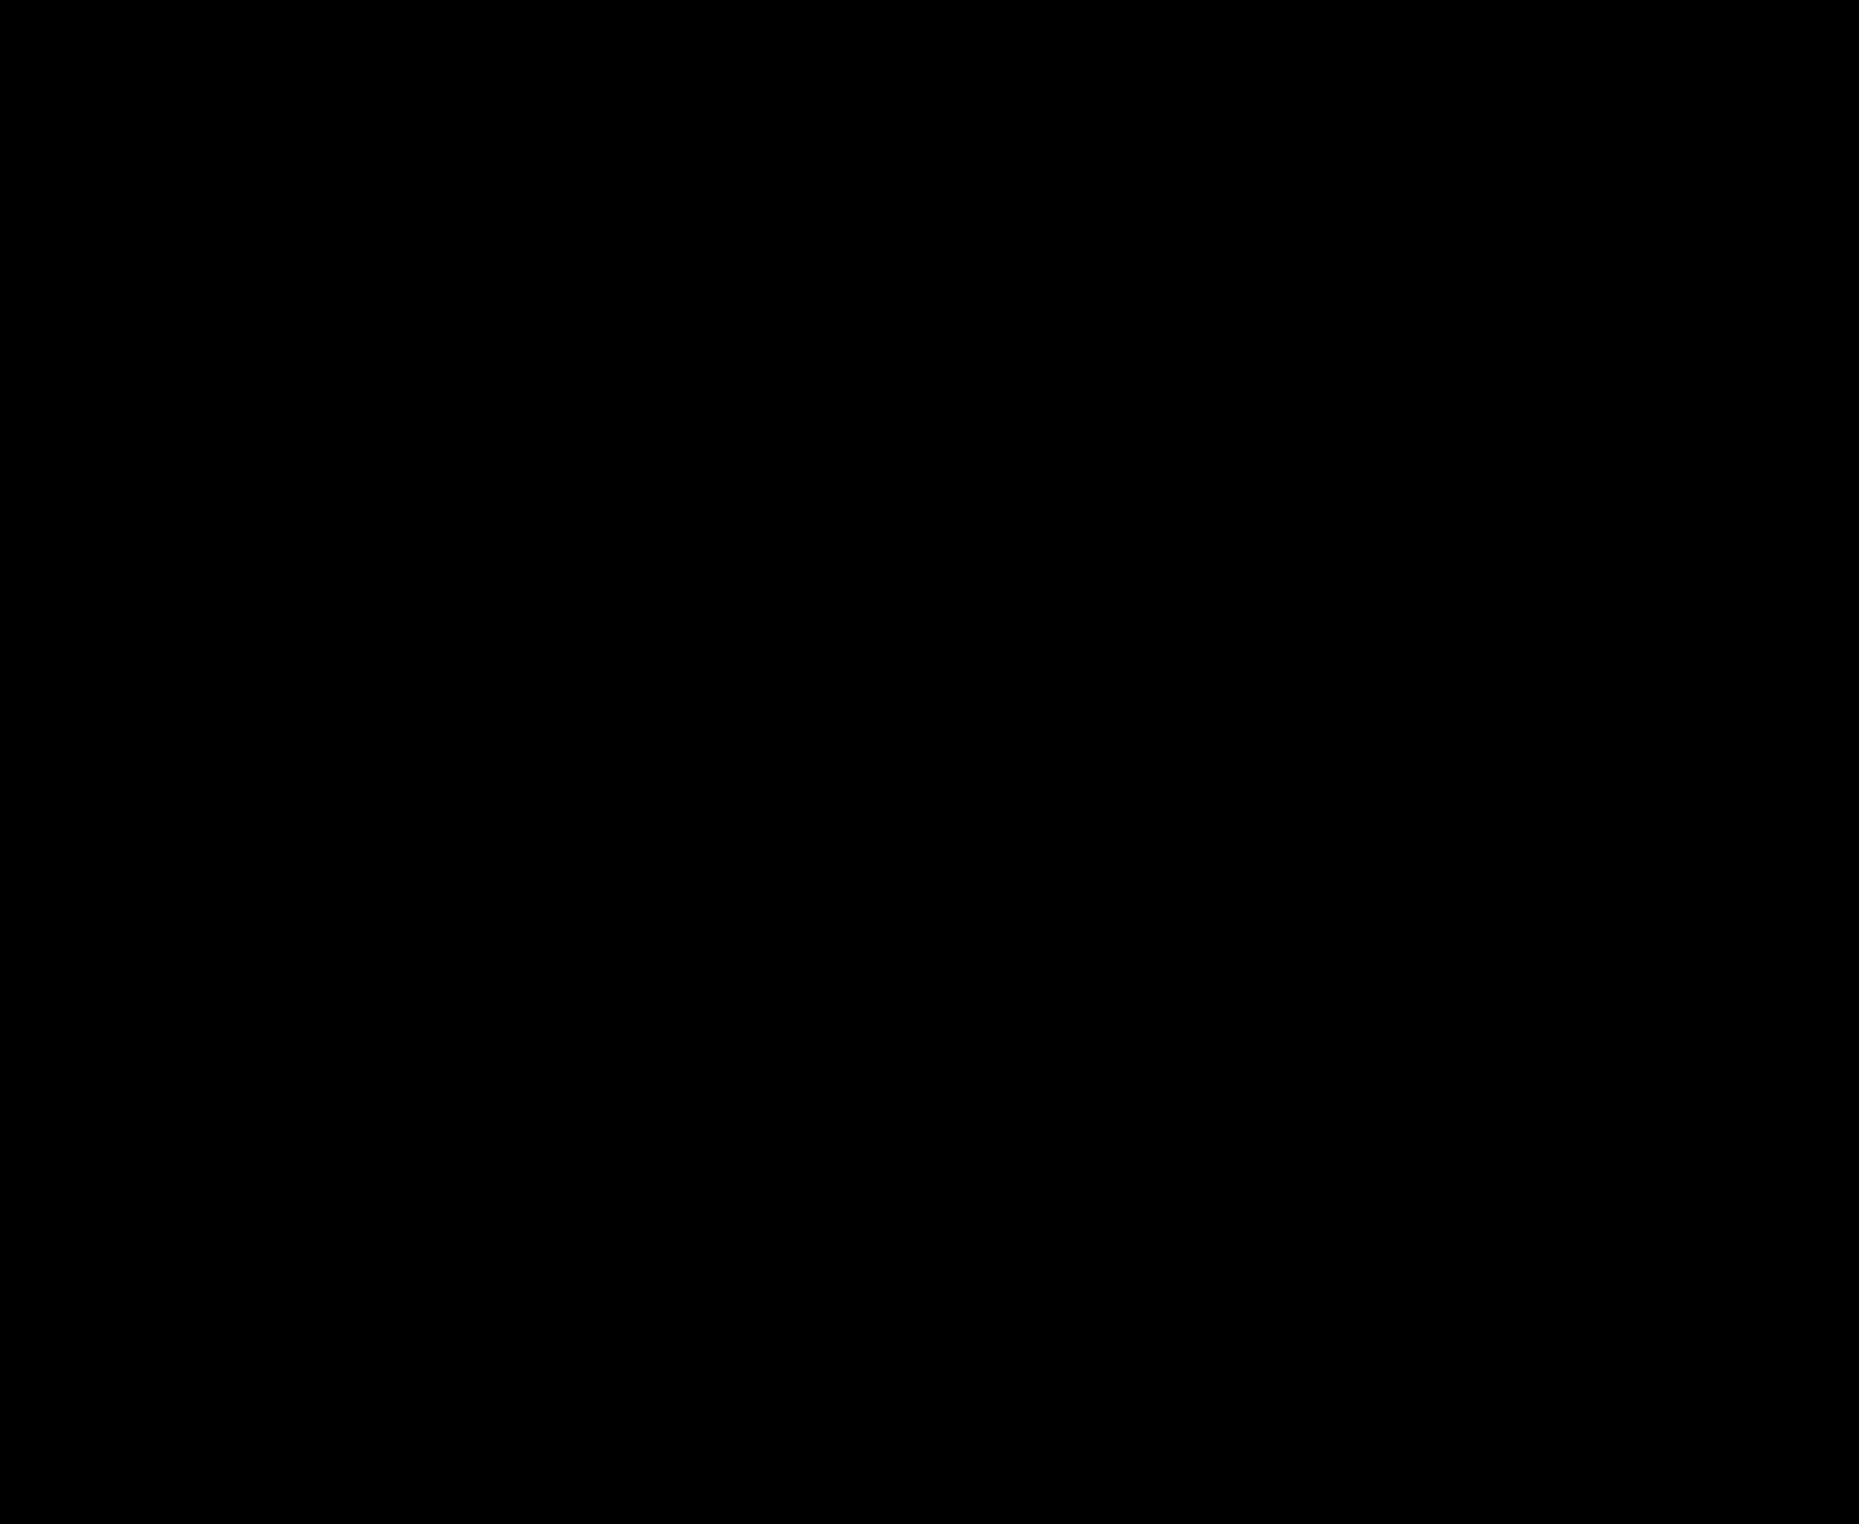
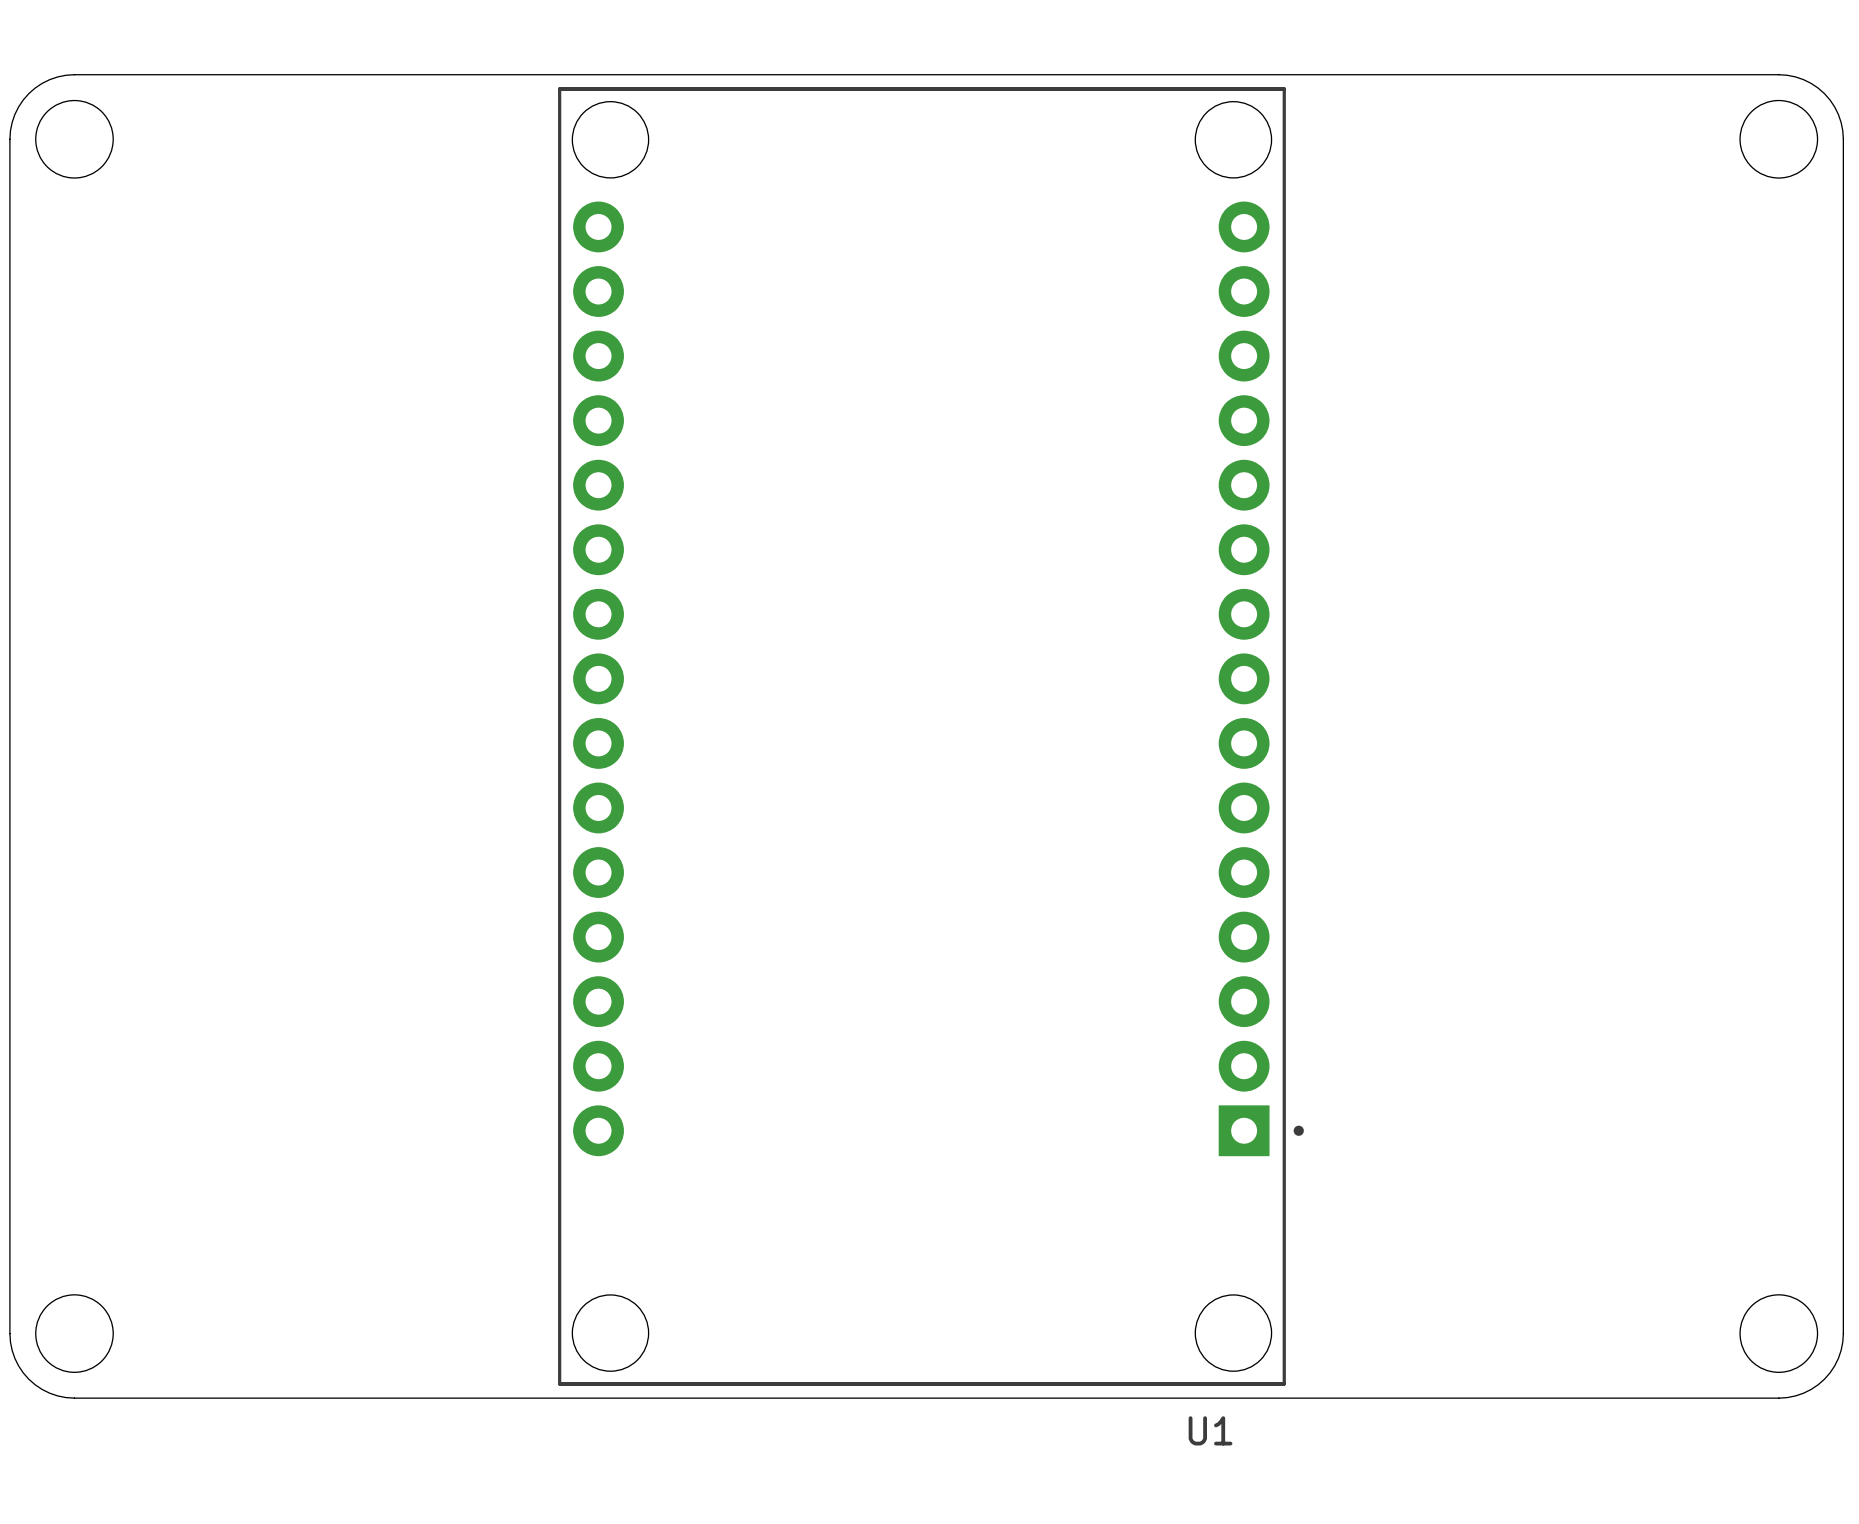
board edge: none -> (74, 74) (1778, 74) (1795, 76) (1818, 88) (1834, 106) (1841, 122) (1843, 139) (1843, 1333) (1841, 1350) (1830, 1372) (1818, 1384) (1803, 1393) (1778, 1398) (74, 1398) (49, 1393) (35, 1384) (18, 1365) (12, 1350) (9, 1333) (9, 139) (14, 114) (28, 93) (49, 79) (74, 74)
round board edge: none -> [35, 99, 114, 179]
round board edge: none -> [1739, 99, 1819, 179]
U1: none -> (930, 736)
round board edge: none -> [35, 1294, 114, 1373]
round board edge: none -> [1739, 1294, 1819, 1373]

